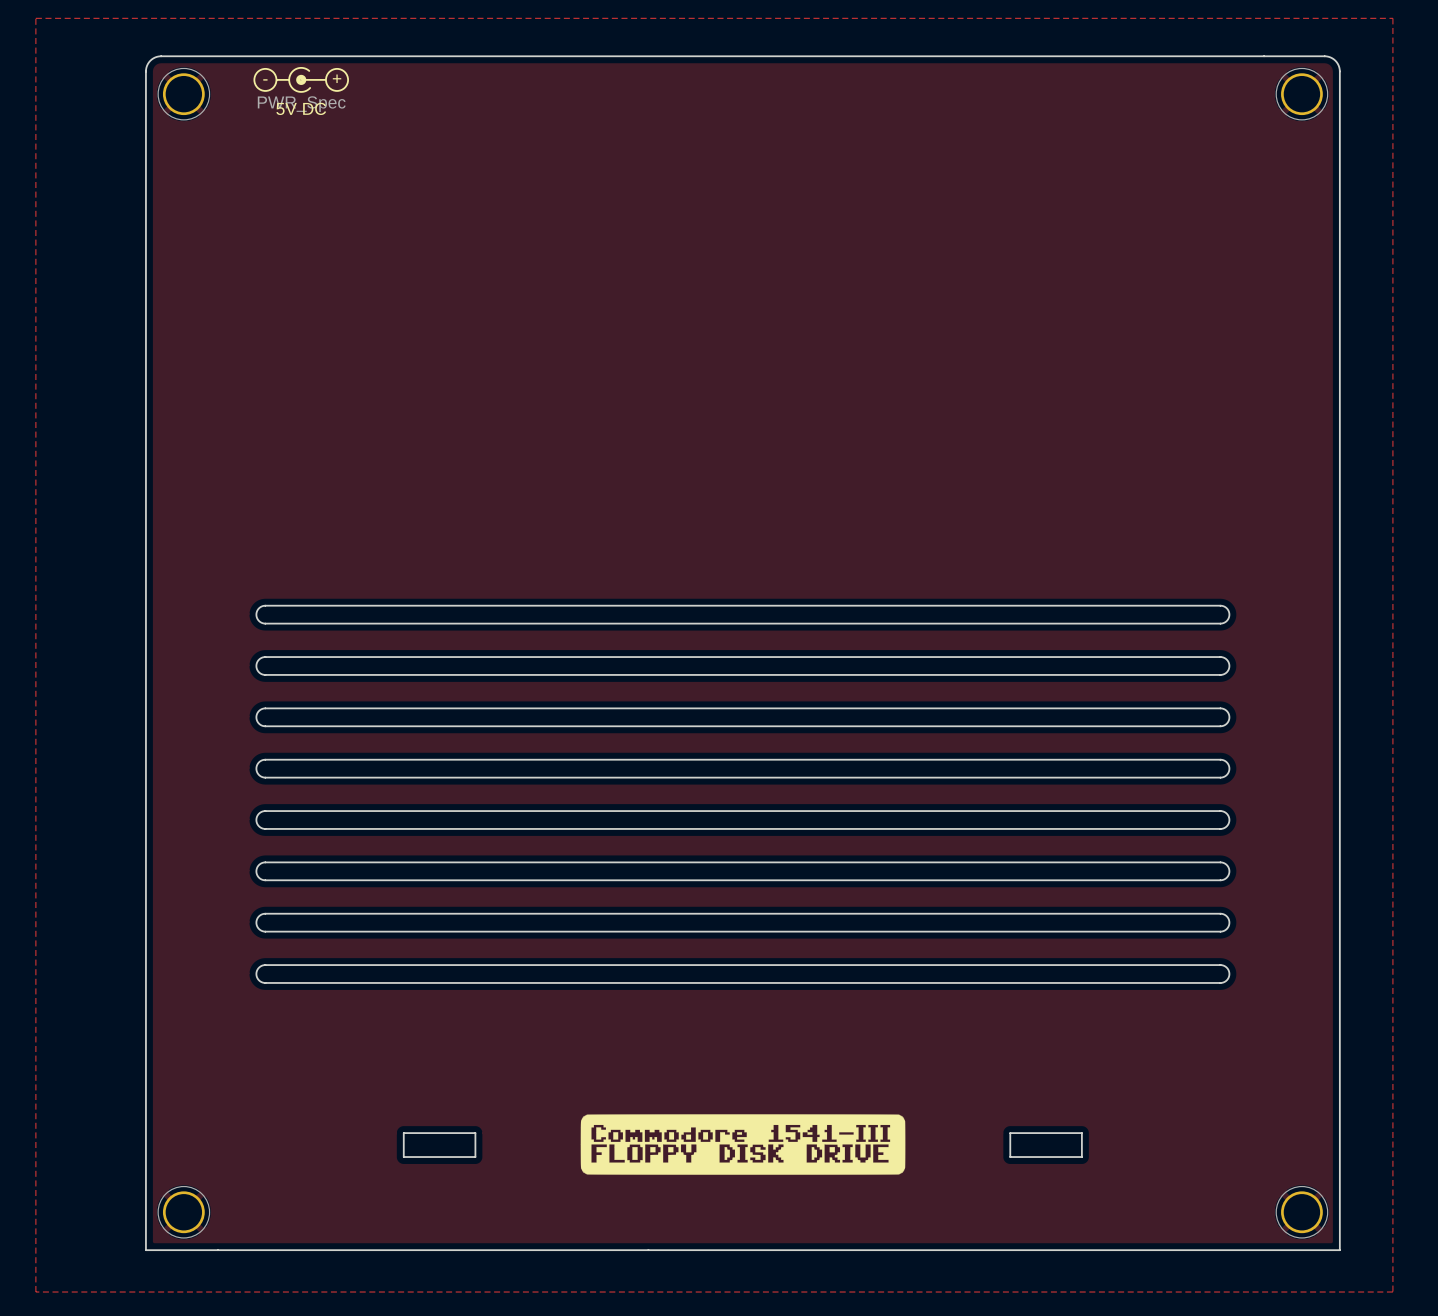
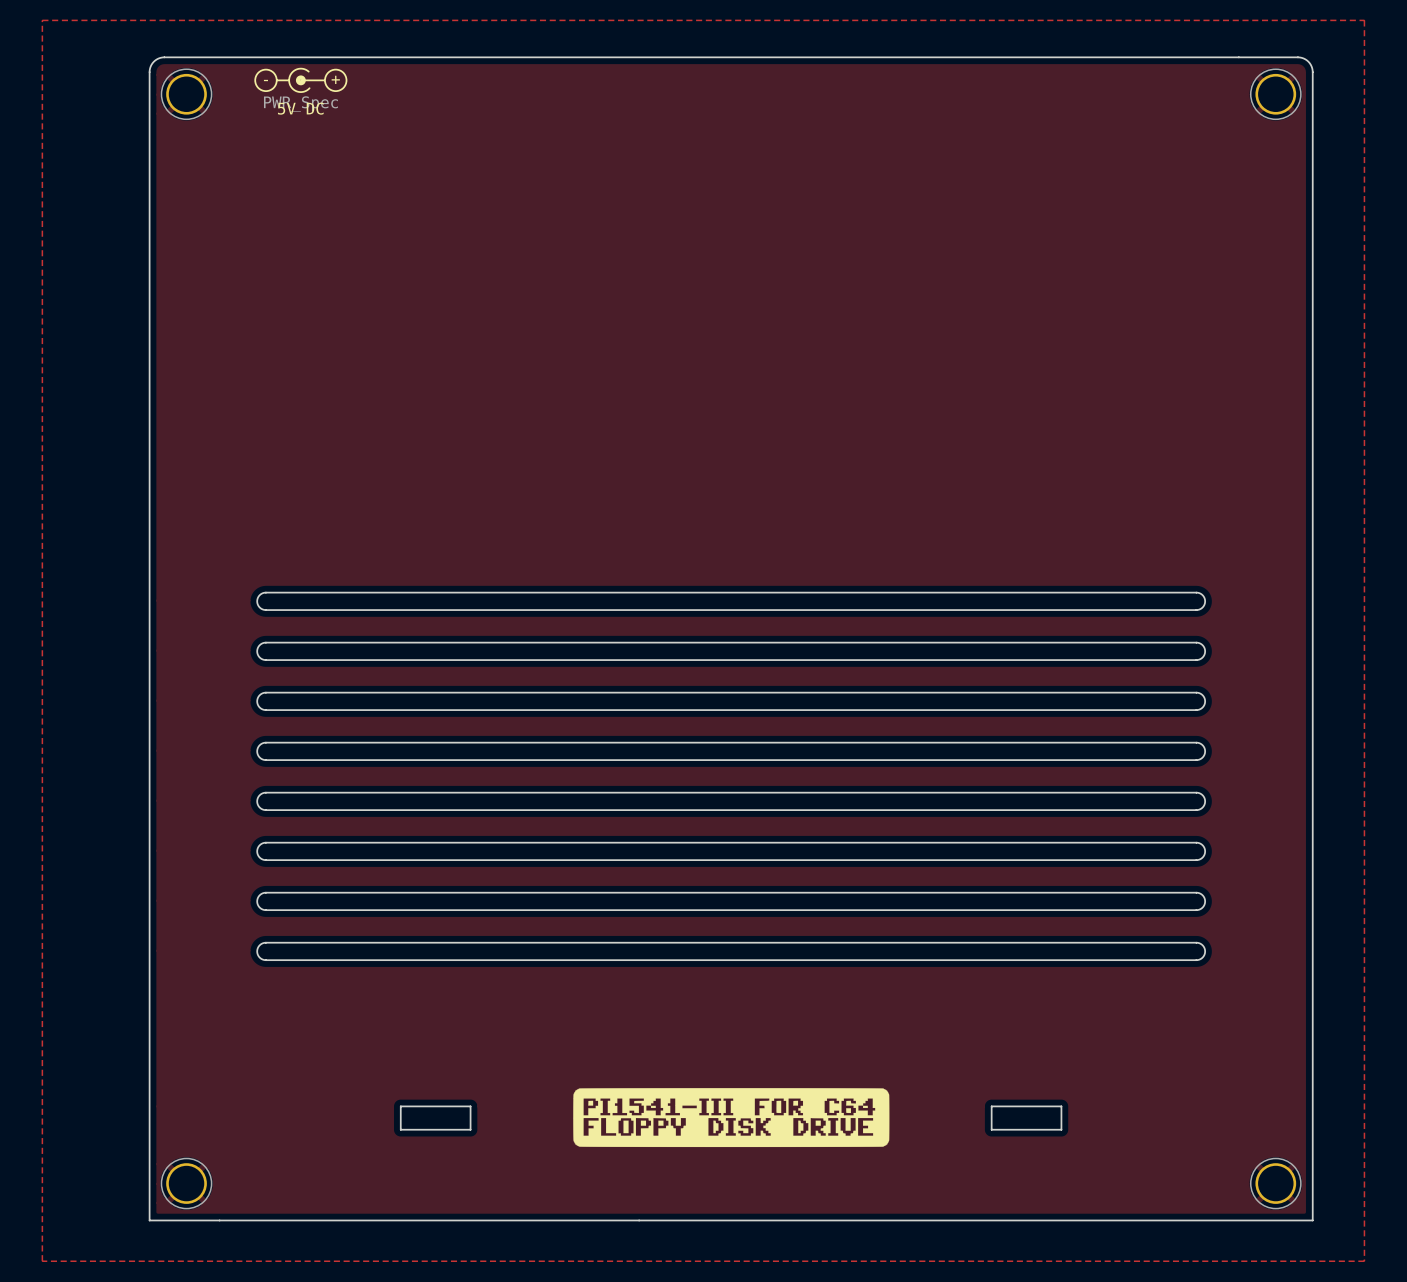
drawing shape: [580, 1114, 906, 1175] -> [573, 1088, 890, 1148]

